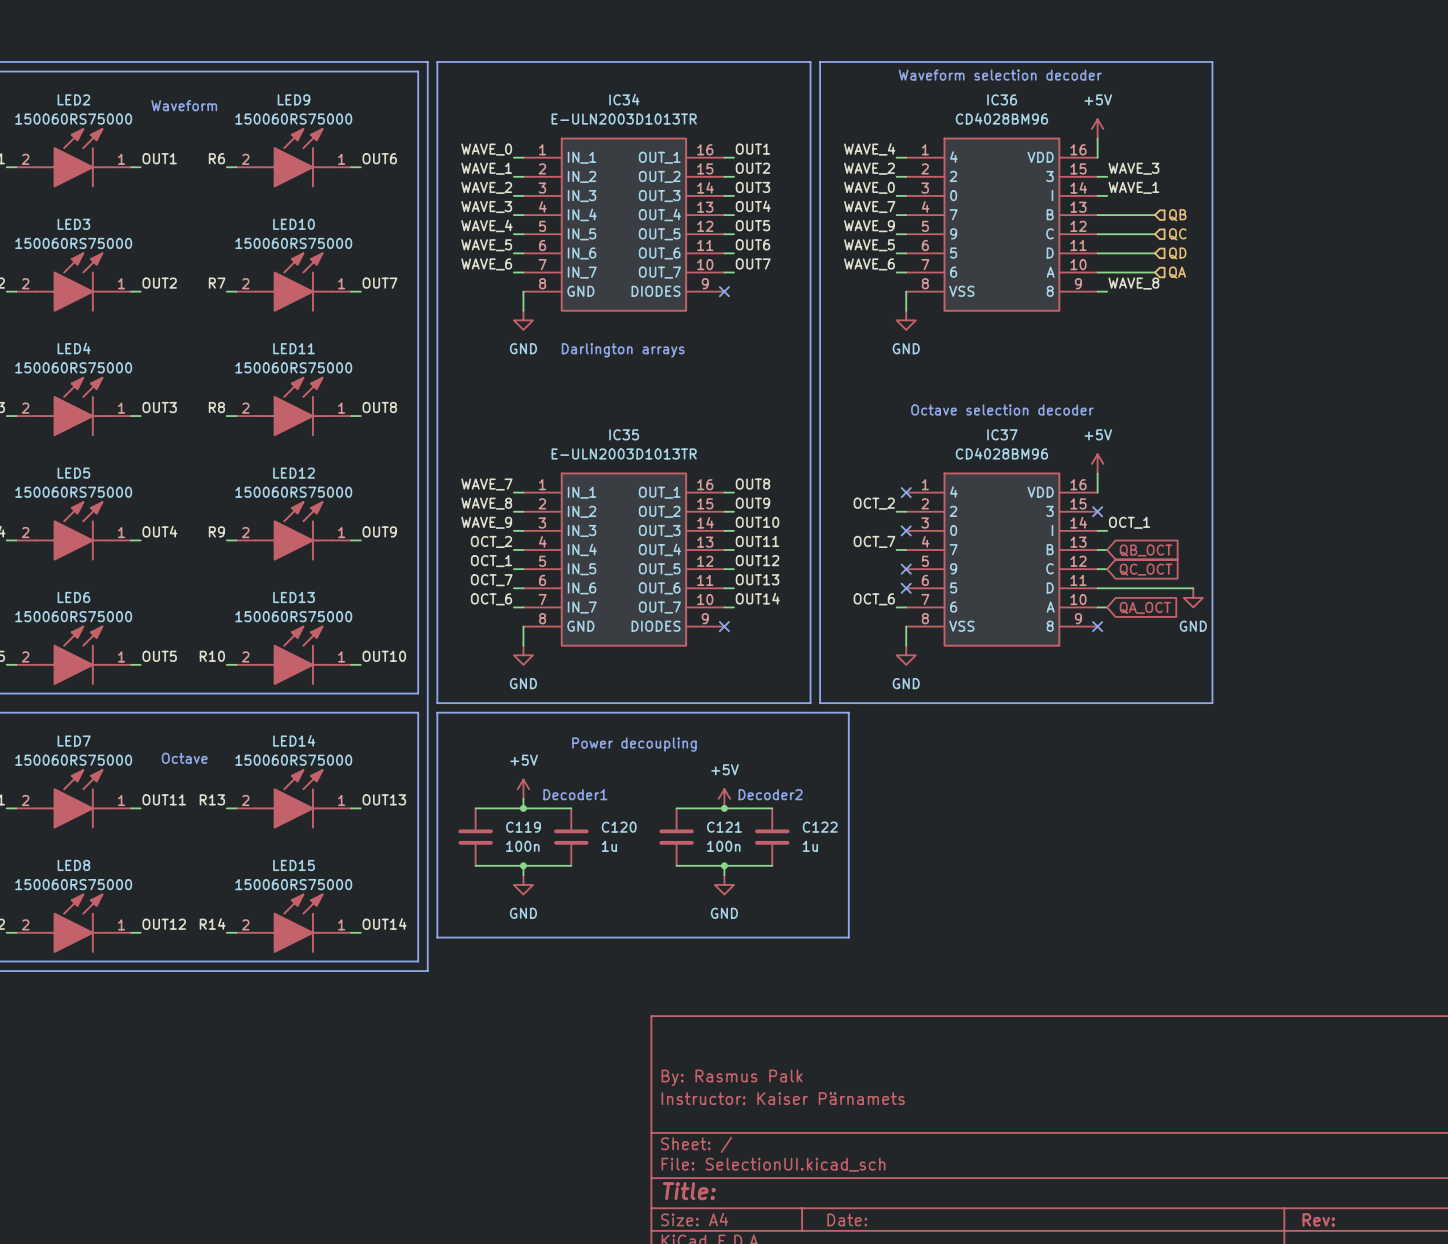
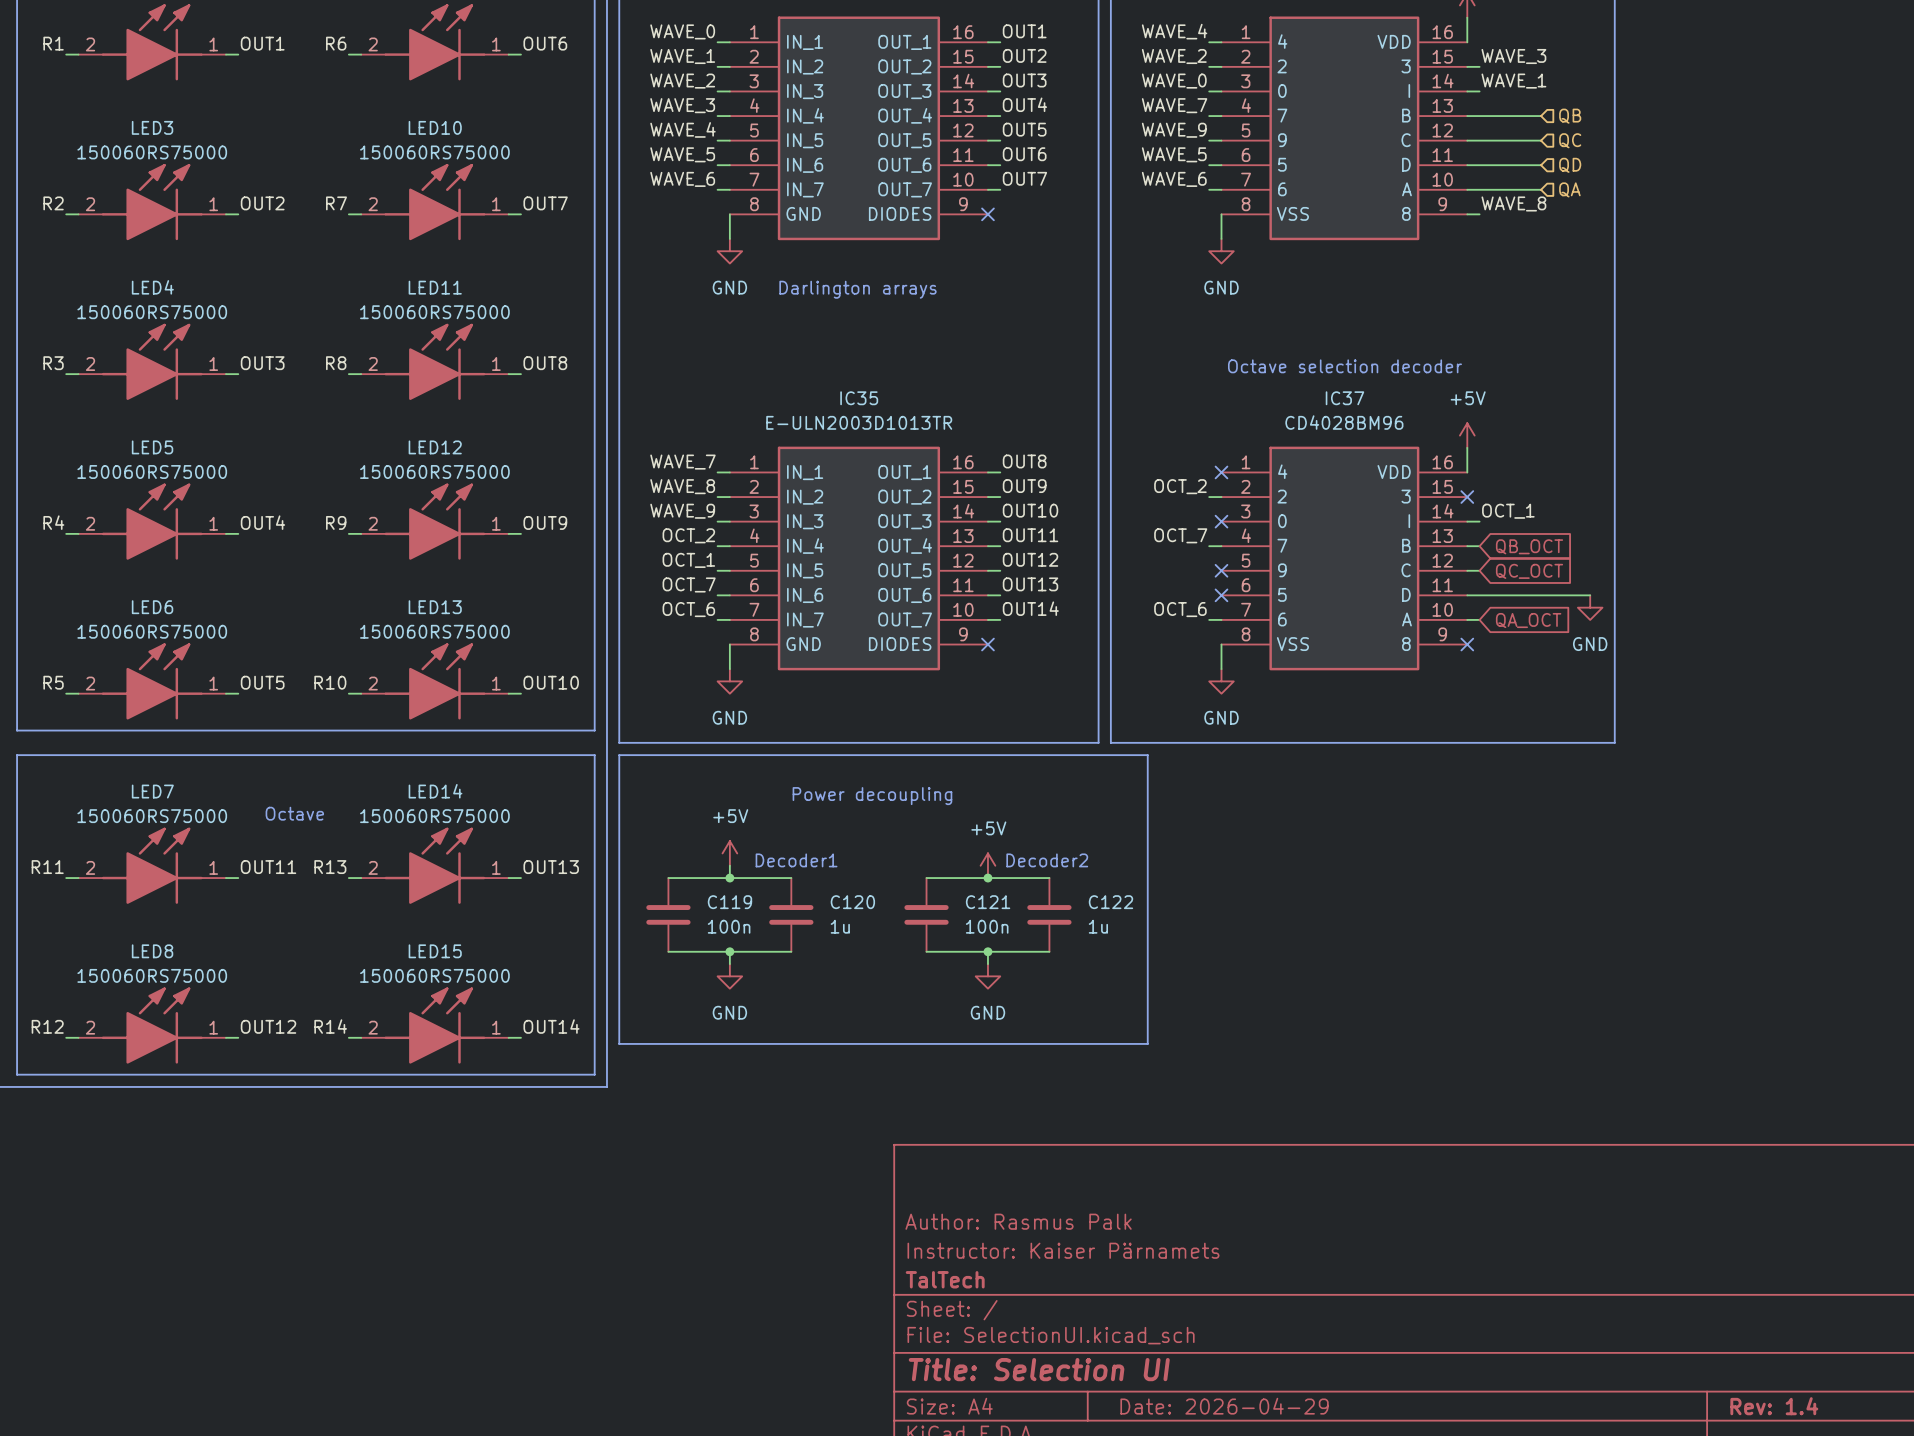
title block: By: Rasmus Palk (732, 1077) -> Author: Rasmus Palk (1018, 1221)
title block: none -> TalTech (945, 1279)
title block: Title: (689, 1191) -> Title: Selection UI (1039, 1369)
title block: Date: (847, 1219) -> Date: 2026-04-29 (1224, 1406)
title block: Rev: (1318, 1219) -> Rev: 1.4 (1774, 1406)

